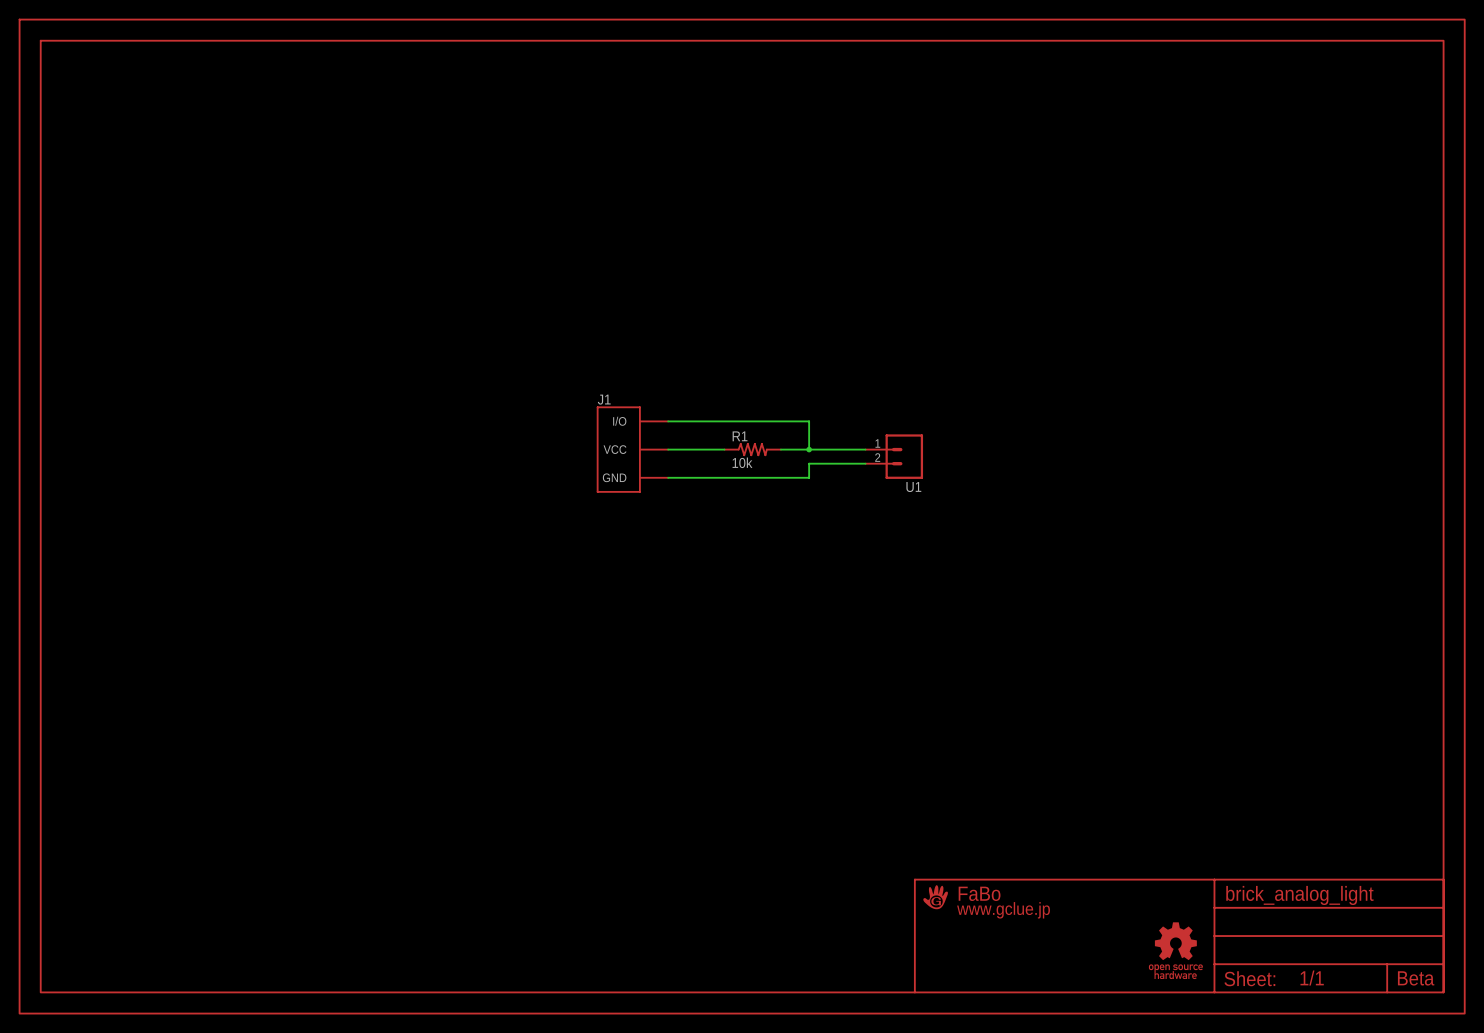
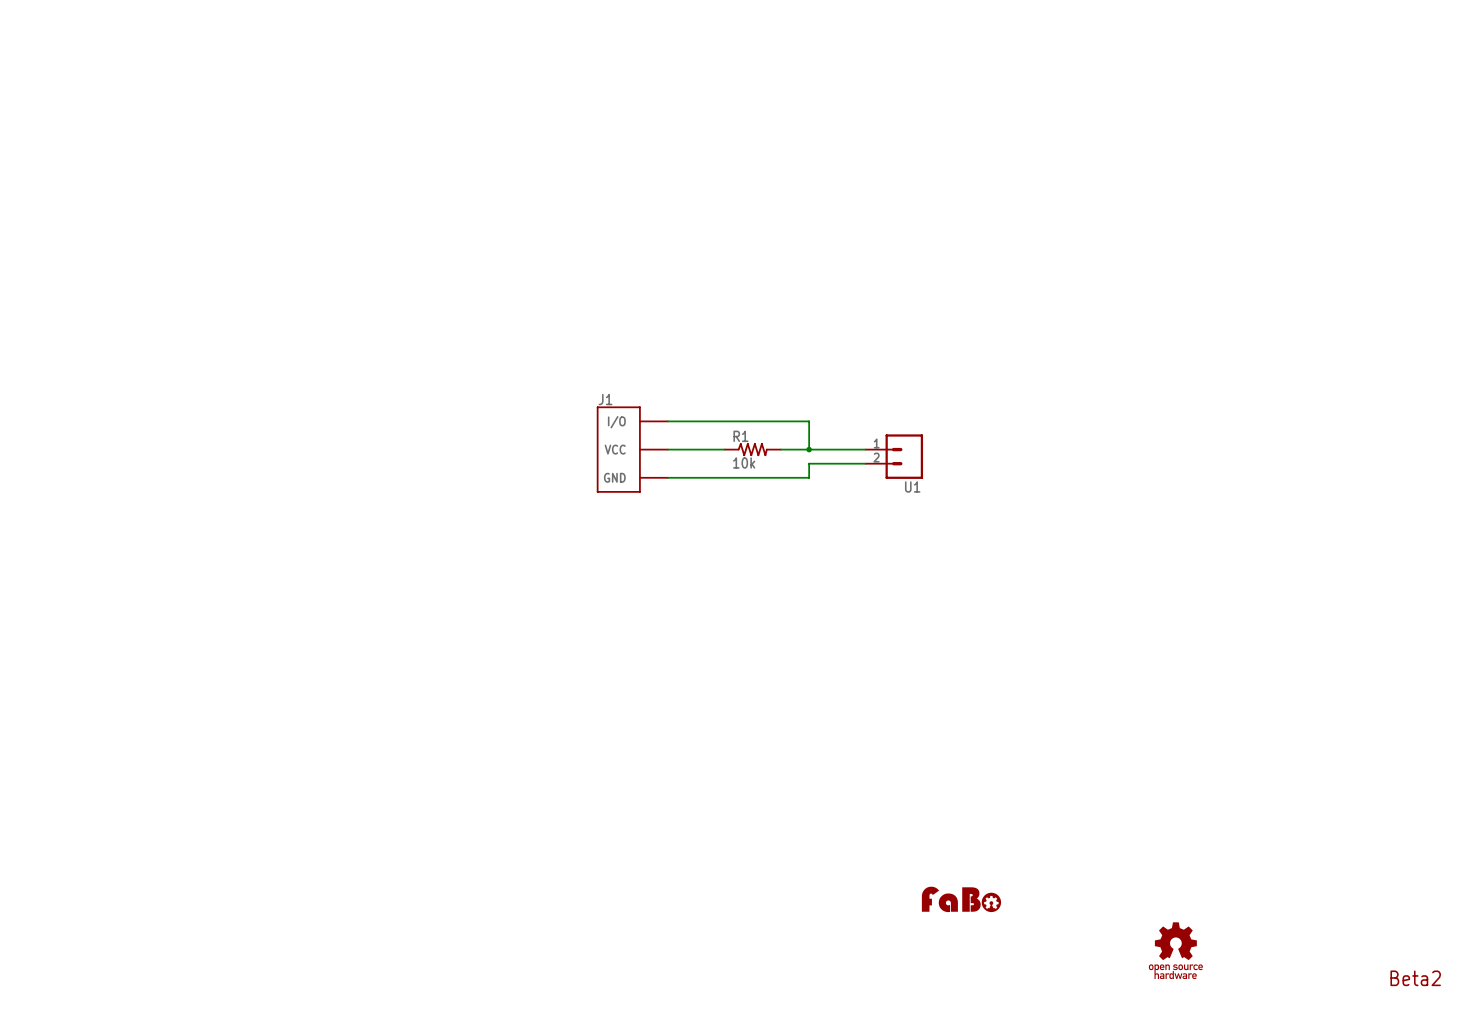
part: (742, 516) -> none
part: none -> (961, 899)
text: Beta (1416, 978) -> Beta2 (1415, 978)

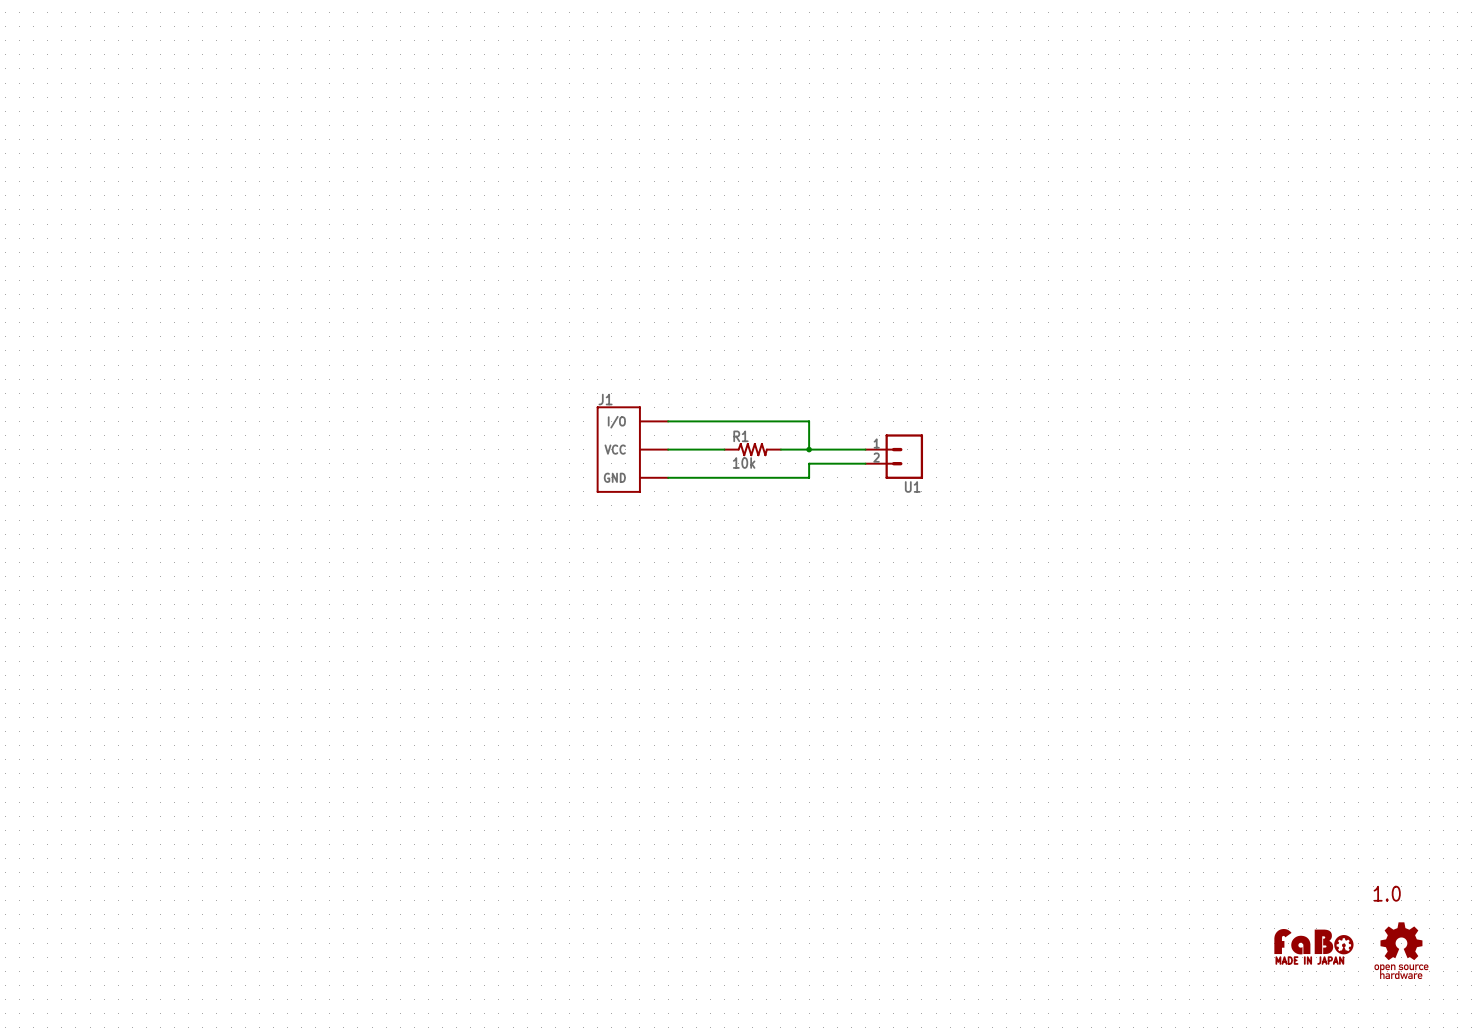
text: none -> 1.0 (1387, 893)
part: (961, 899) -> none
part: none -> (1313, 941)
part: (1175, 950) -> none
part: none -> (1401, 950)
text: Beta2 (1415, 978) -> none

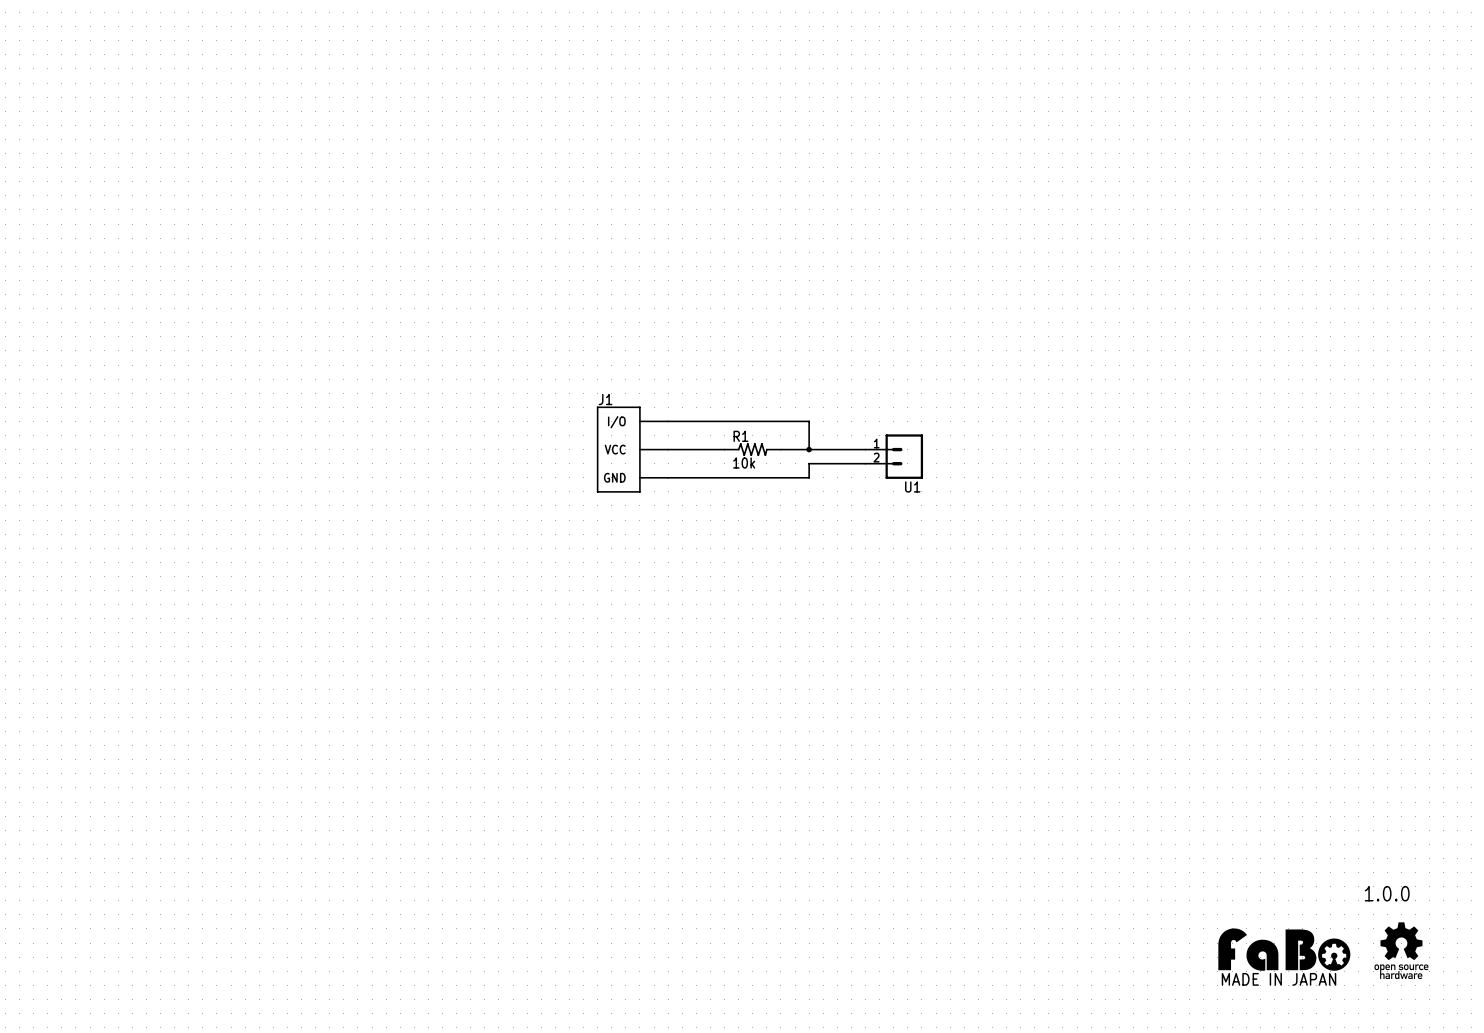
text: 1.0 (1387, 893) -> 1.0.0 (1387, 893)
part: (1313, 941) -> none
part: none -> (1284, 949)

